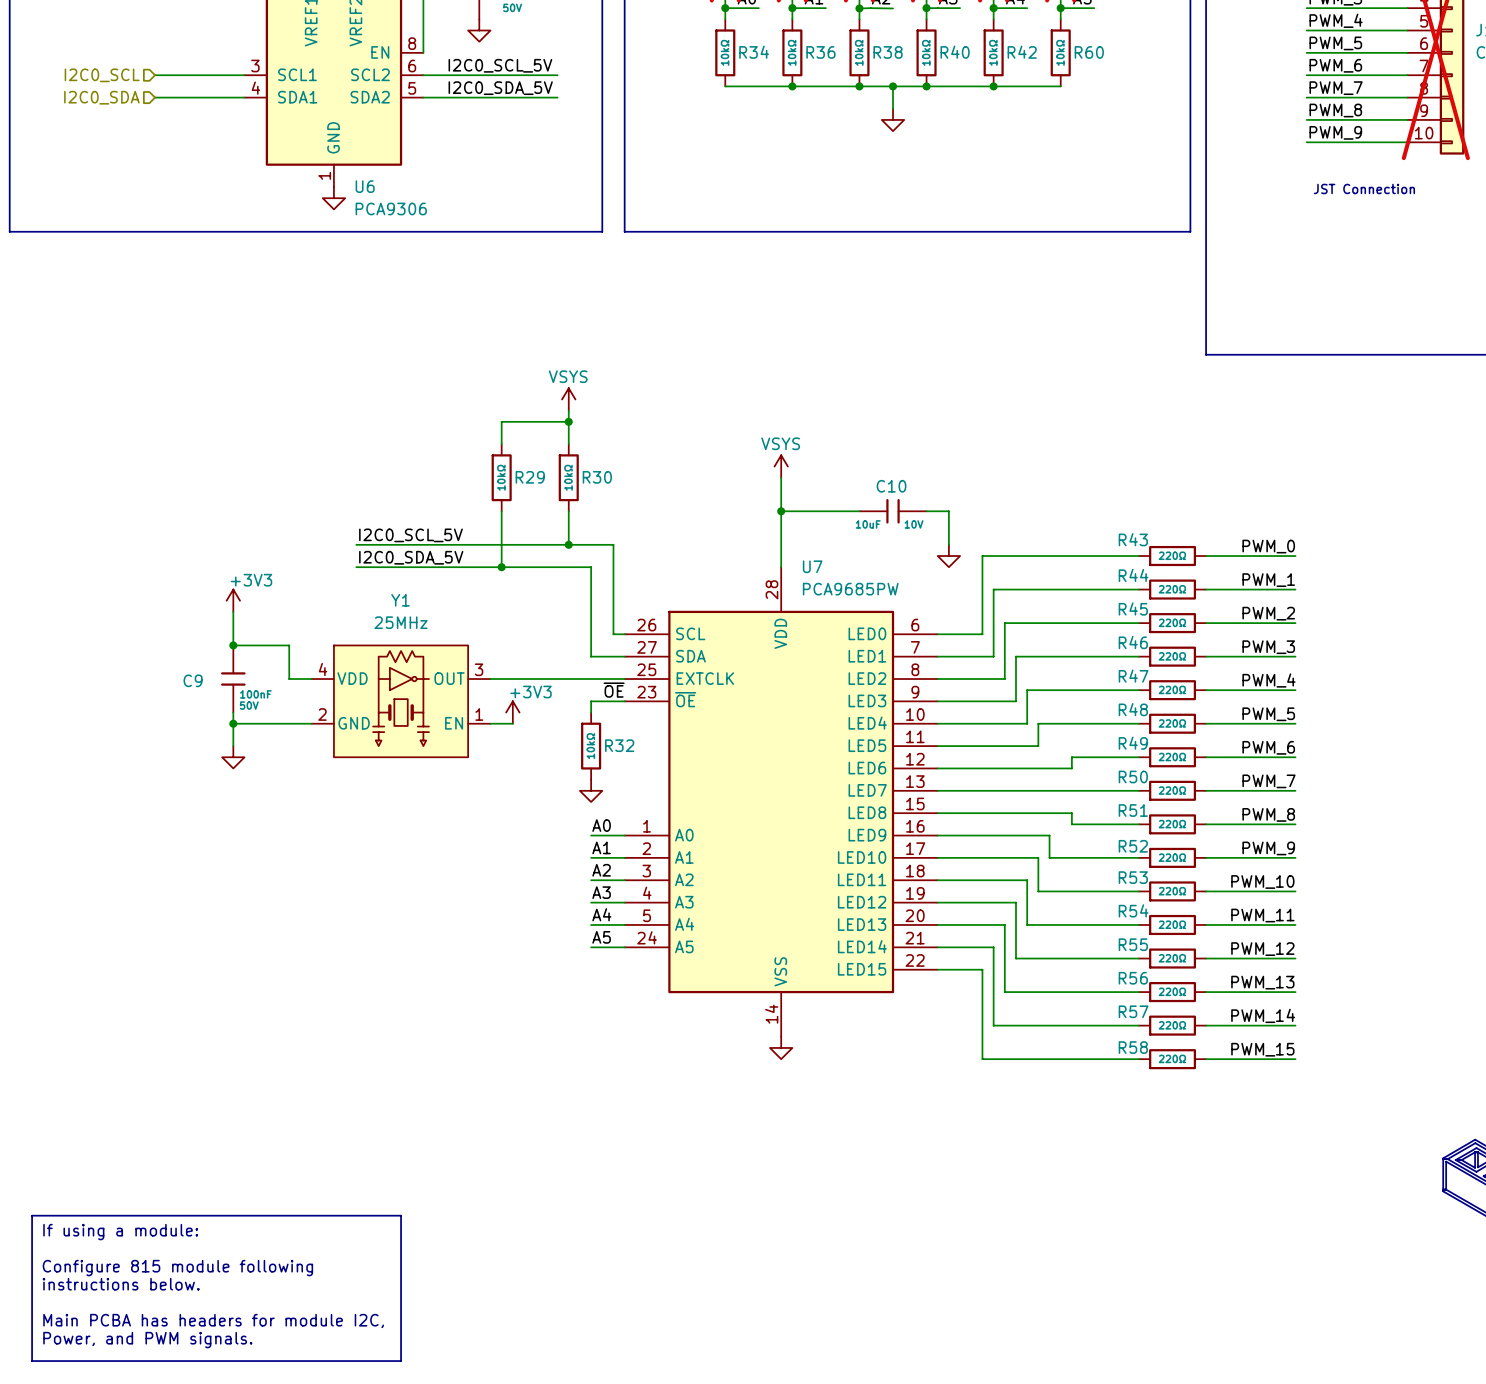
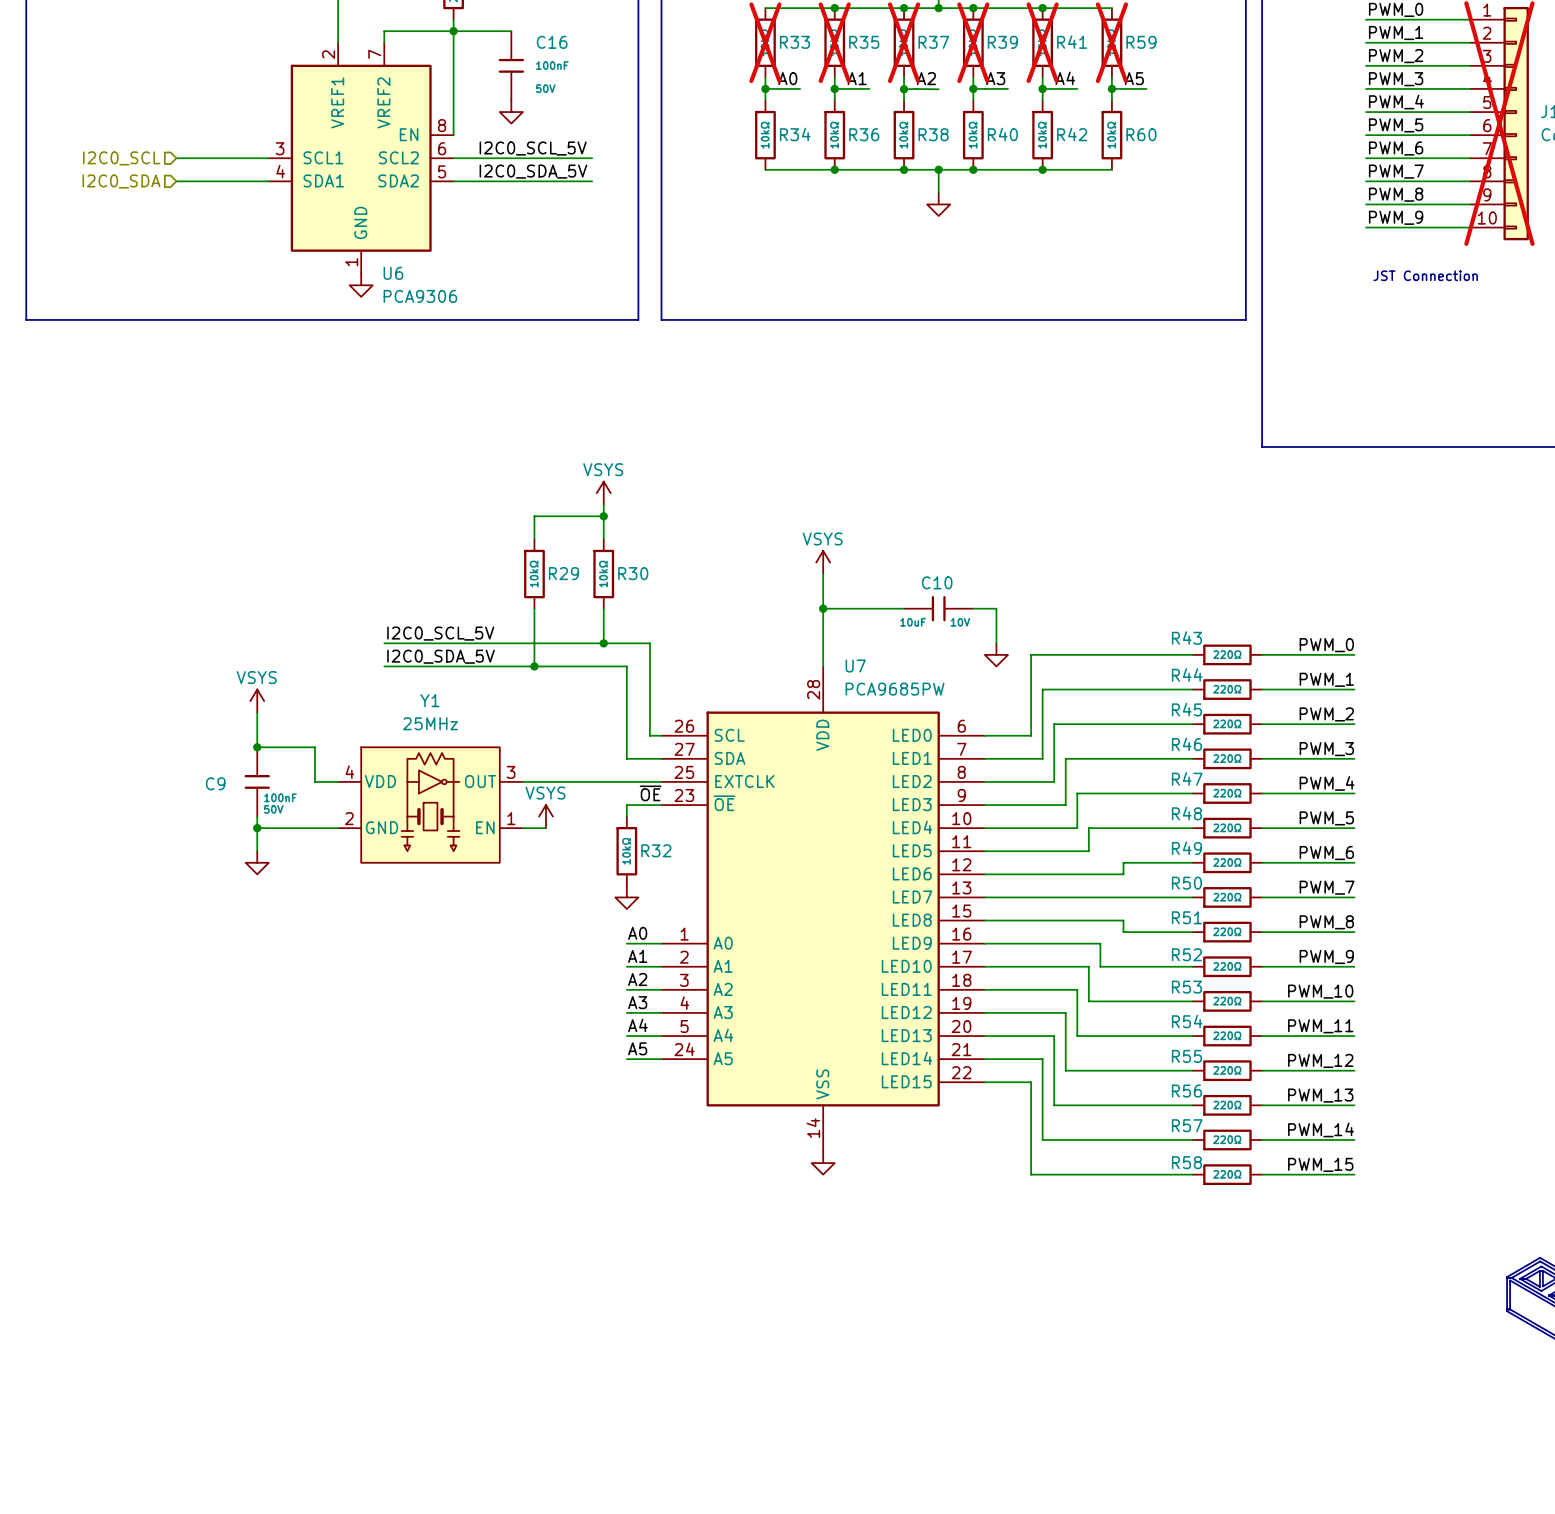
power symbol: +3V3 (233, 600) -> VSYS (257, 701)
power symbol: +3V3 (512, 712) -> VSYS (545, 816)
line: (32, 1215) (401, 1215) (401, 1361) (32, 1361) (32, 1215) -> none
text: If using a module: (120, 1232) -> none
text: Configure 815 module following (177, 1268) -> none
text: instructions below. (121, 1284) -> none
text: Main PCBA has headers for module I2C, (213, 1321) -> none
text: Power, and PWM signals. (147, 1340) -> none

